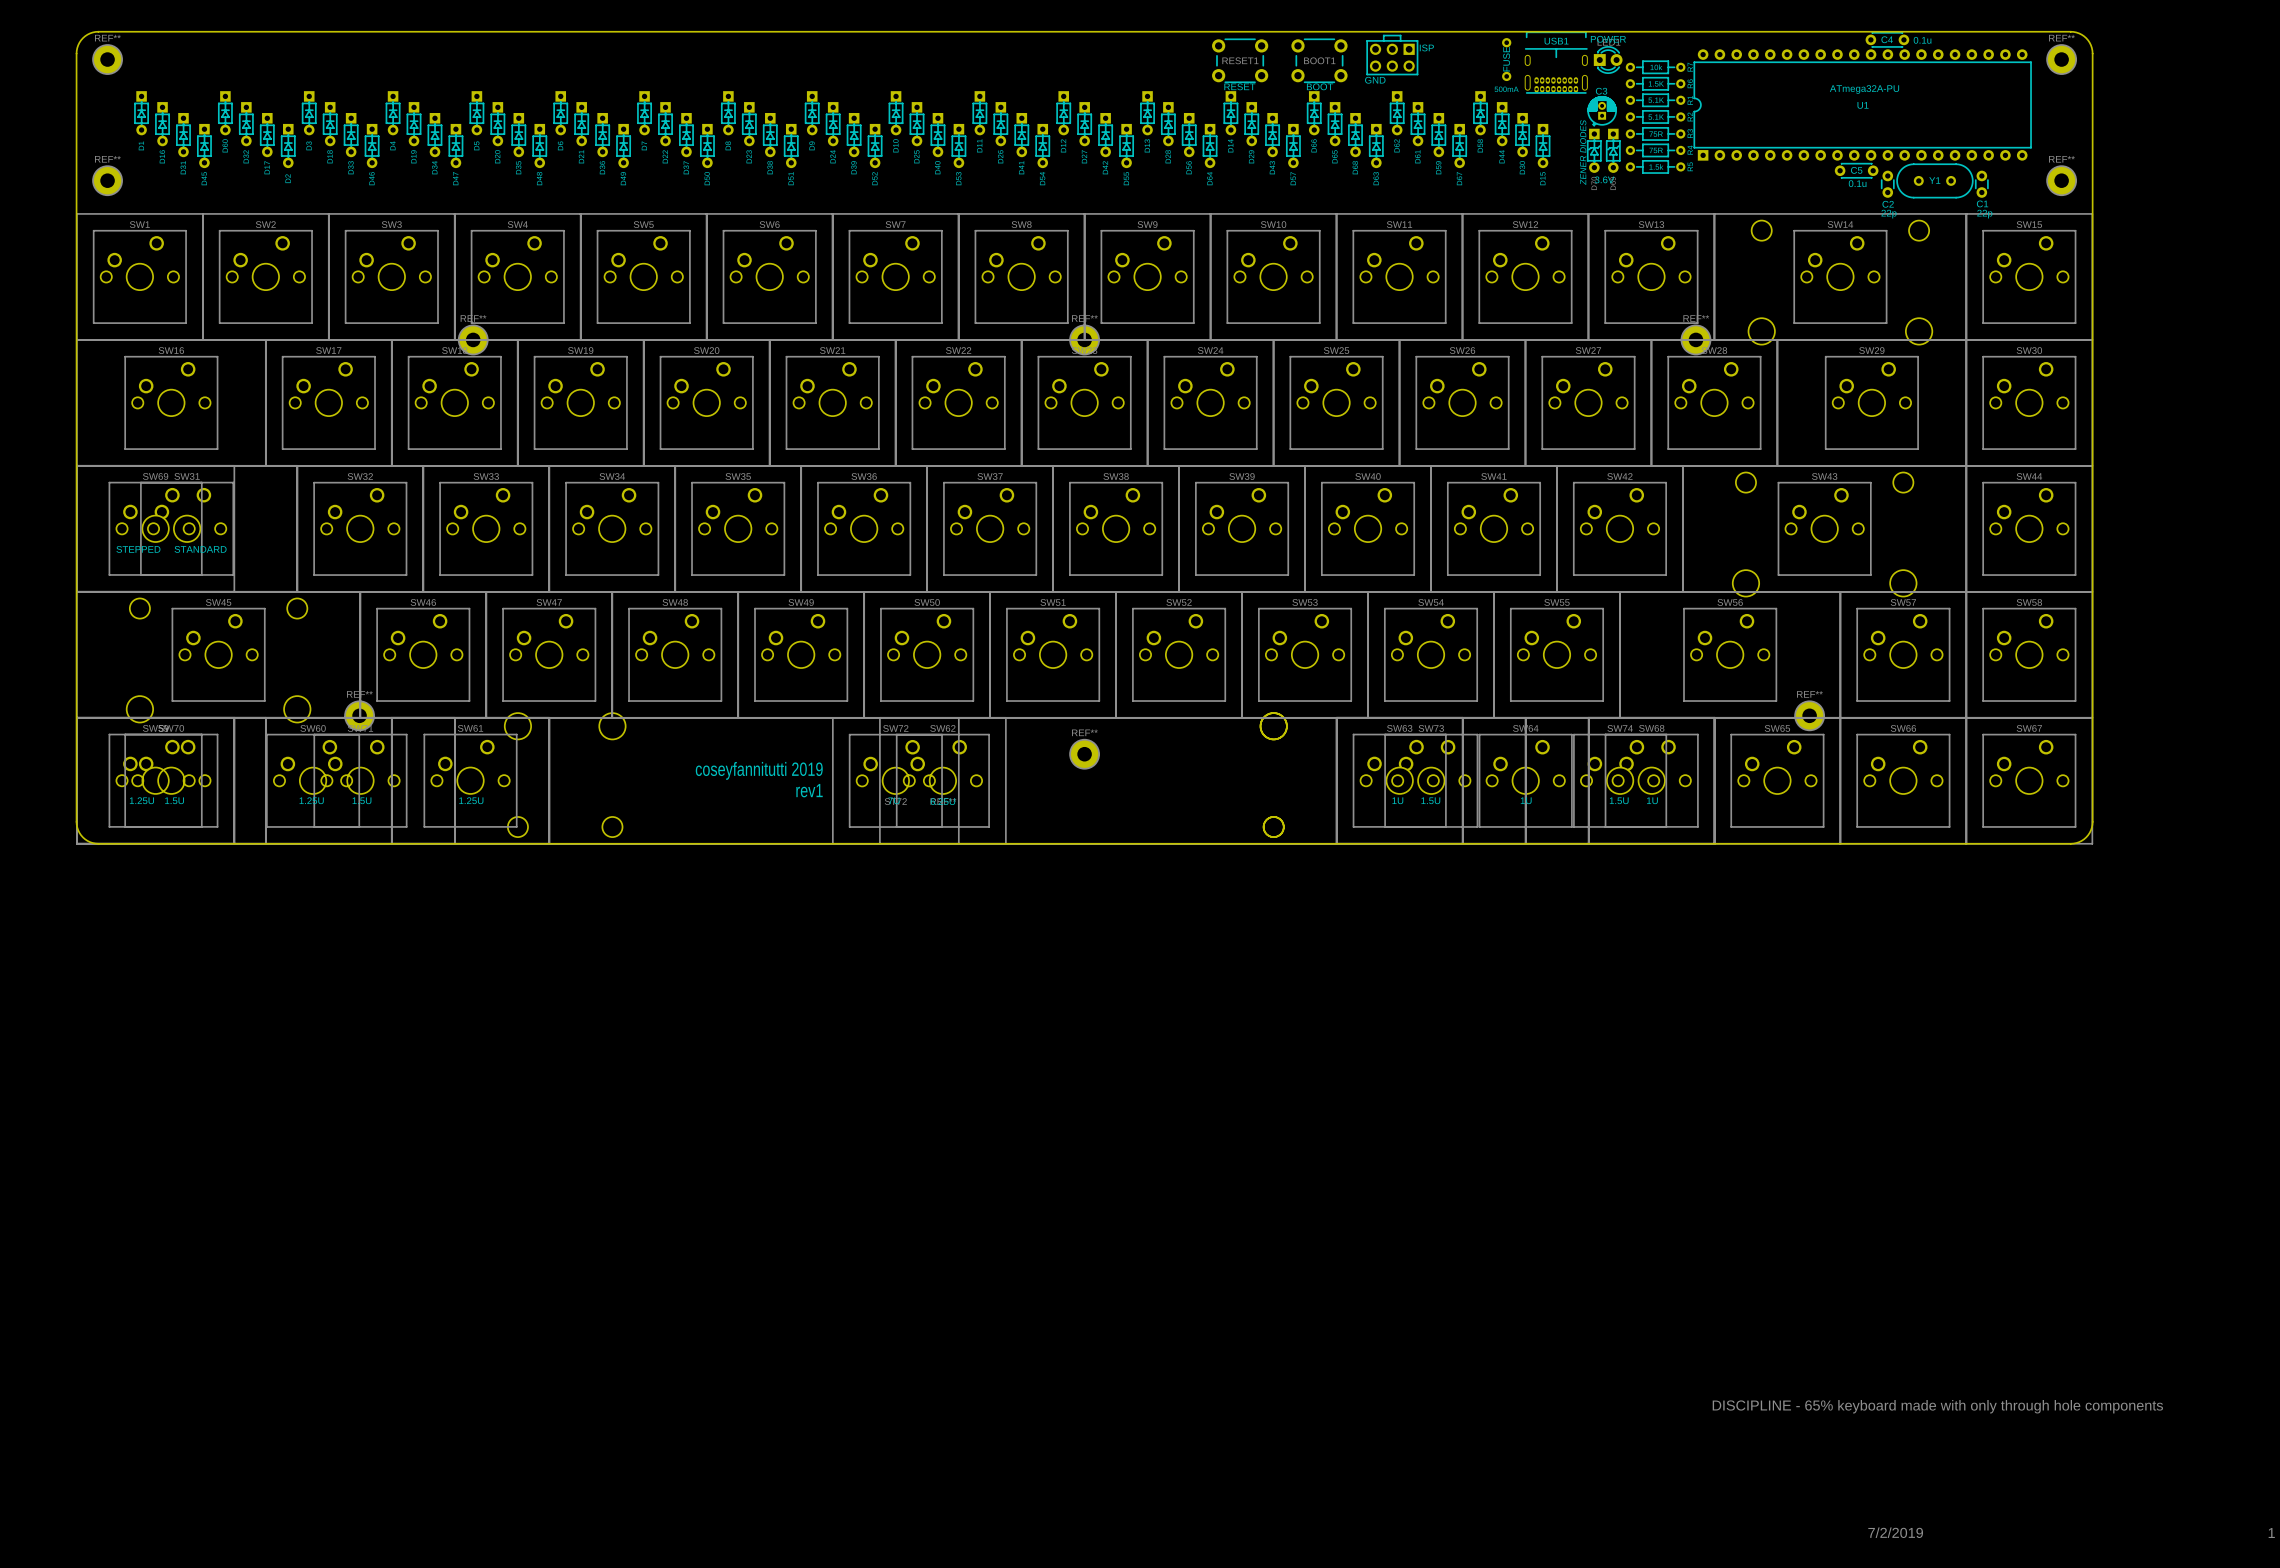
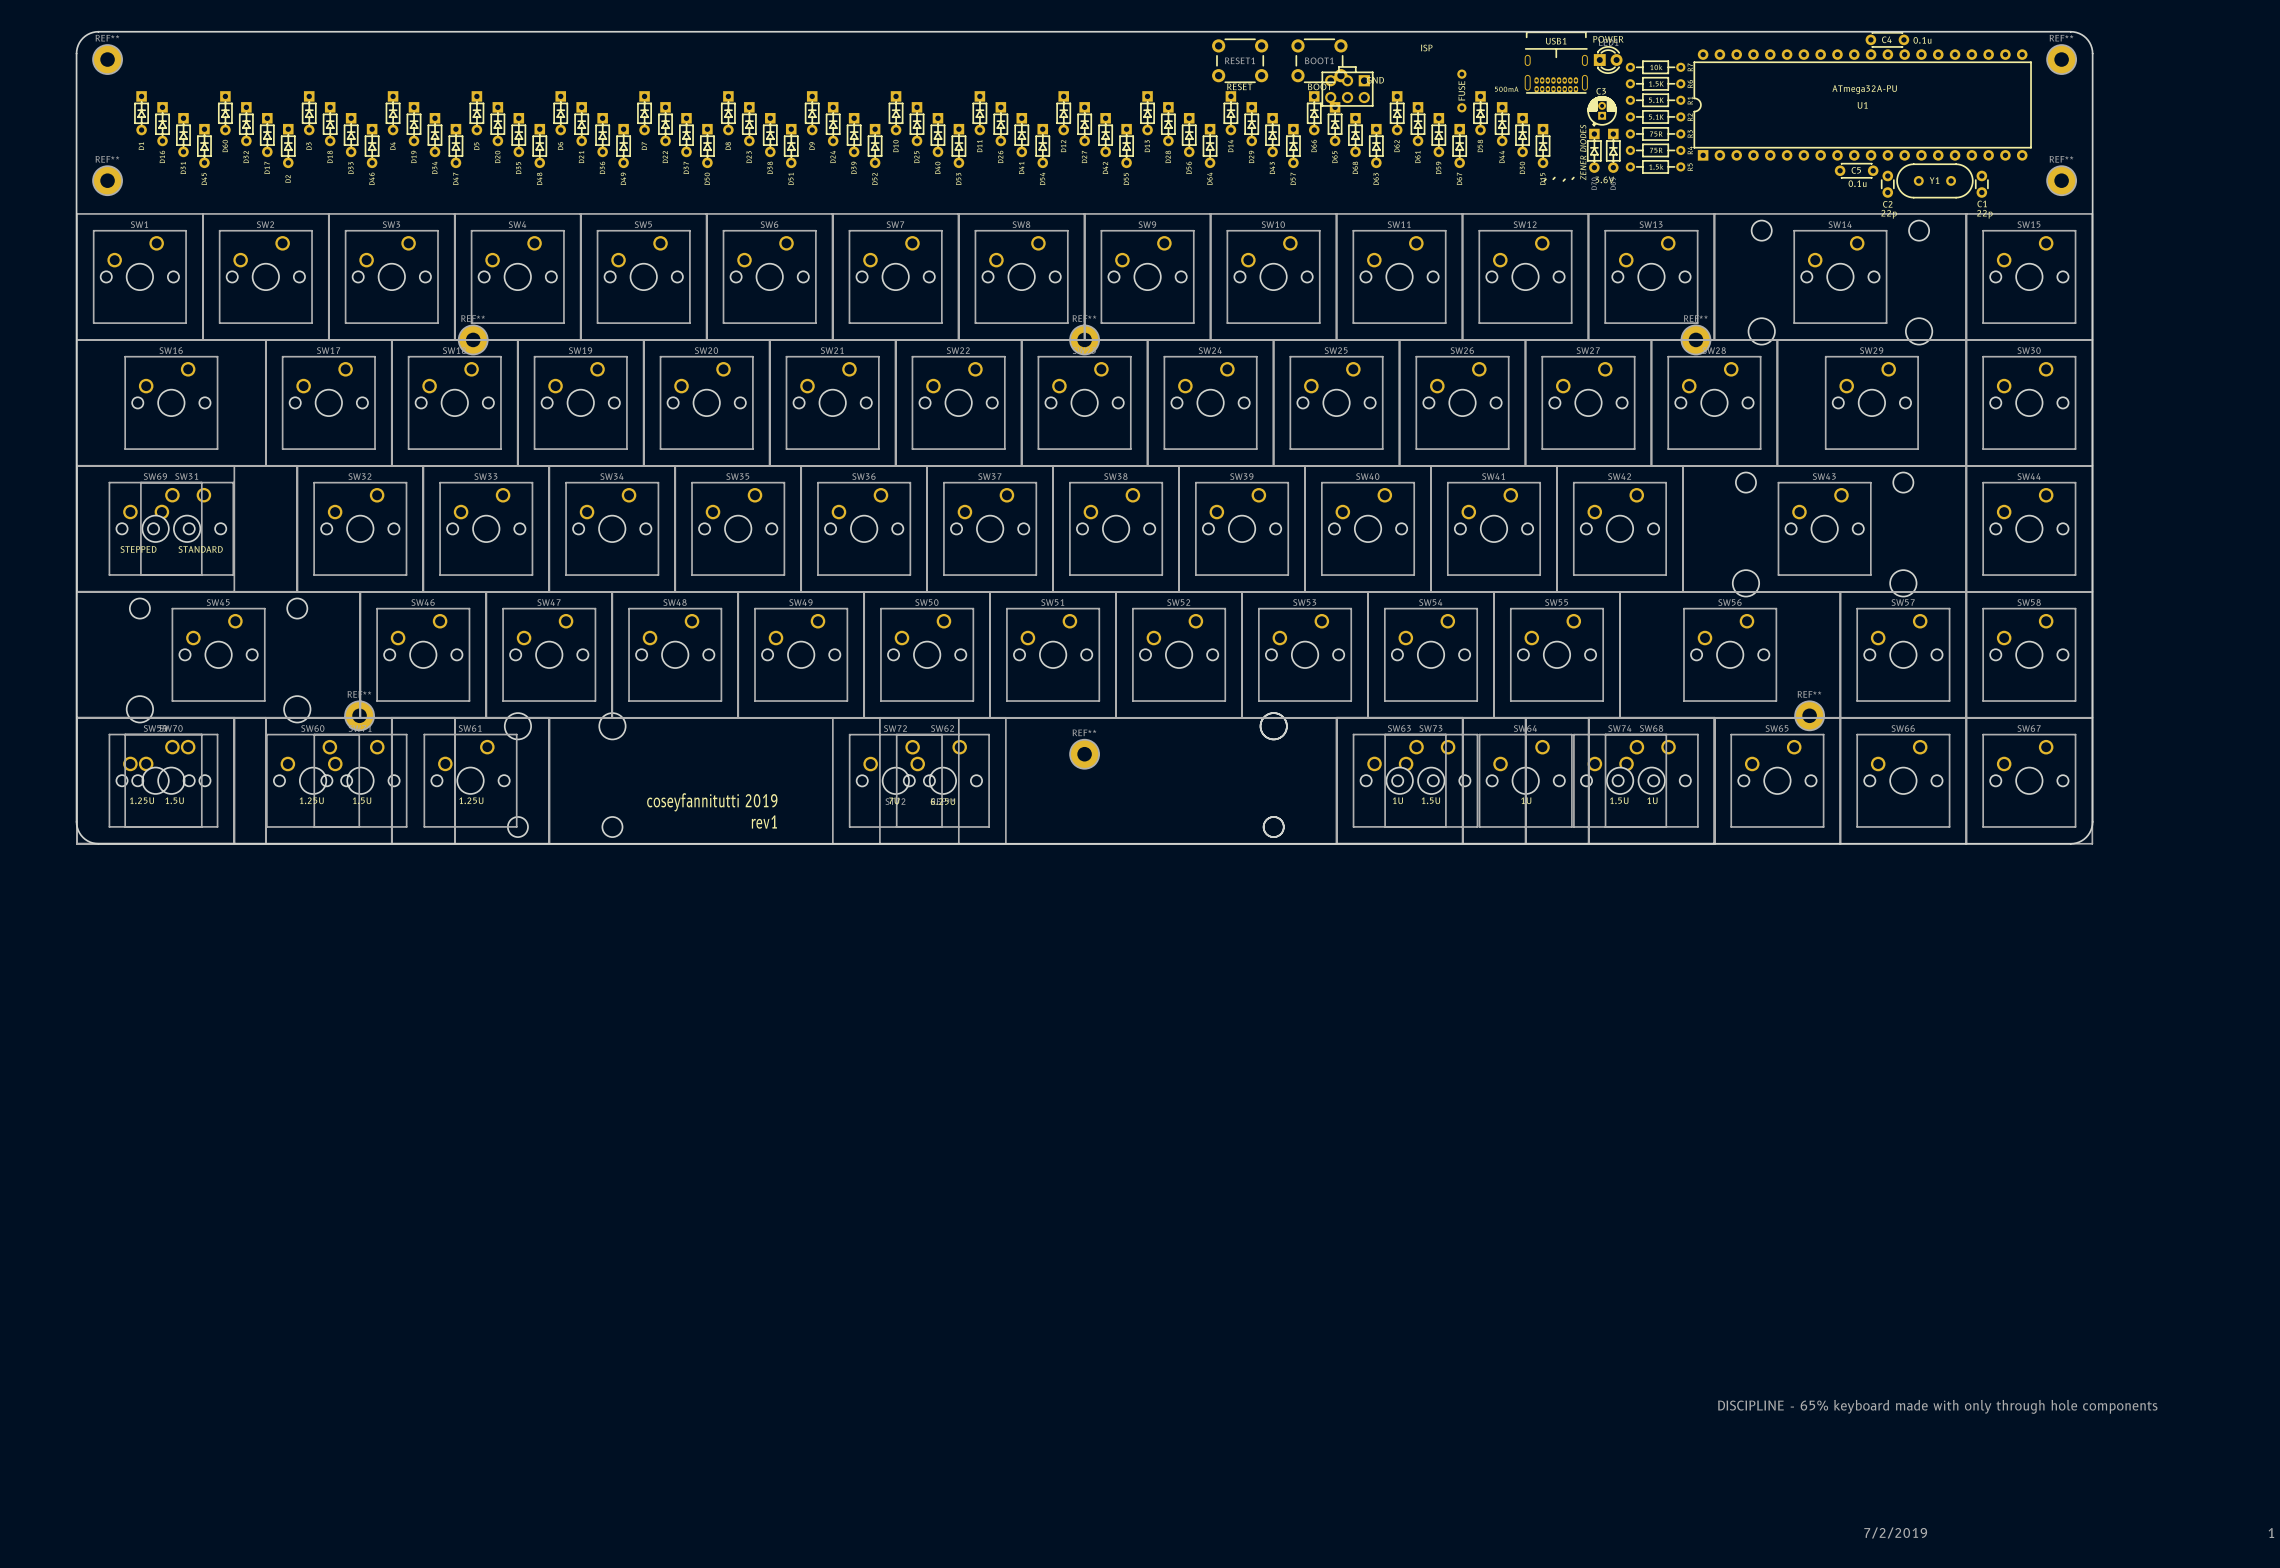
part position: (1392, 55) -> (1347, 86)
part position: (1506, 59) -> (1461, 90)
line: (1599, 146) (1598, 147) -> (1554, 177) (1553, 179)
line: (1618, 146) (1617, 147) -> (1573, 177) (1572, 179)
line: (1590, 147) (1589, 149) -> (1545, 179) (1544, 181)
line: (1609, 147) (1608, 149) -> (1565, 179) (1563, 181)
text position: coseyfannitutti 2019 (759, 770) -> coseyfannitutti 2019 (712, 802)
text position: rev1 (809, 790) -> rev1 (764, 822)

